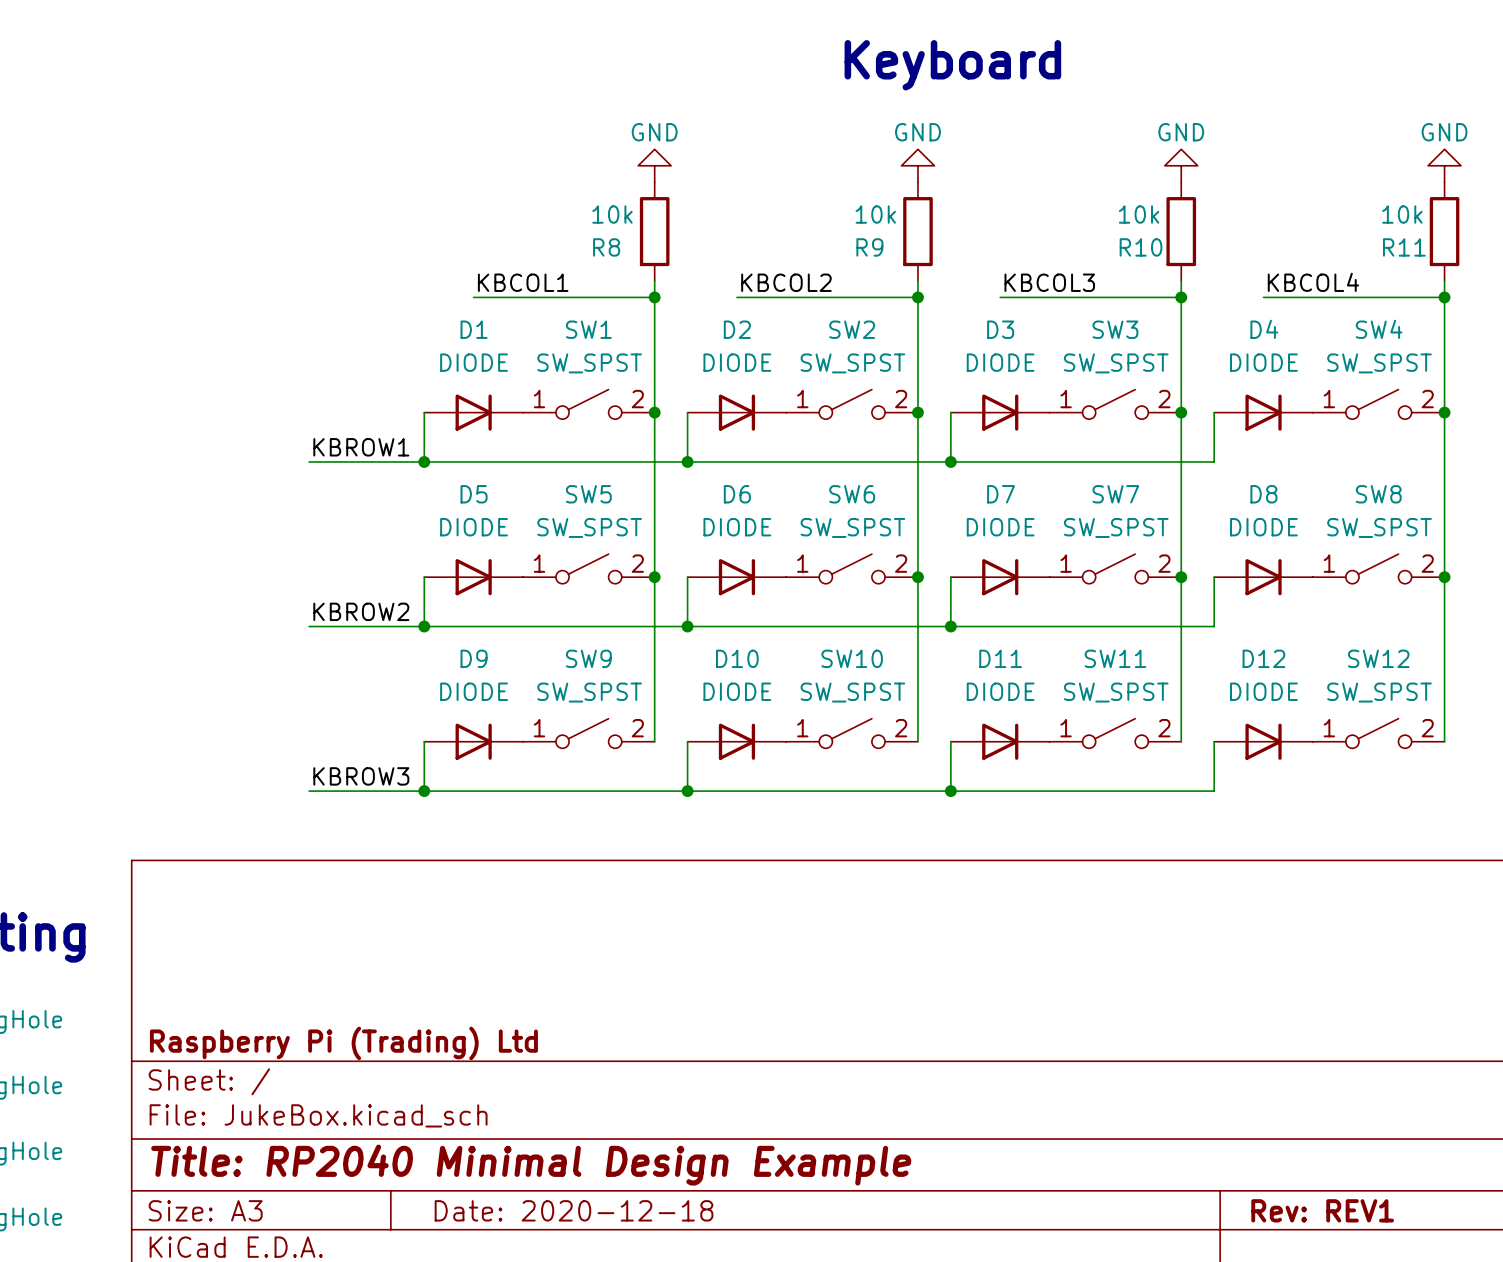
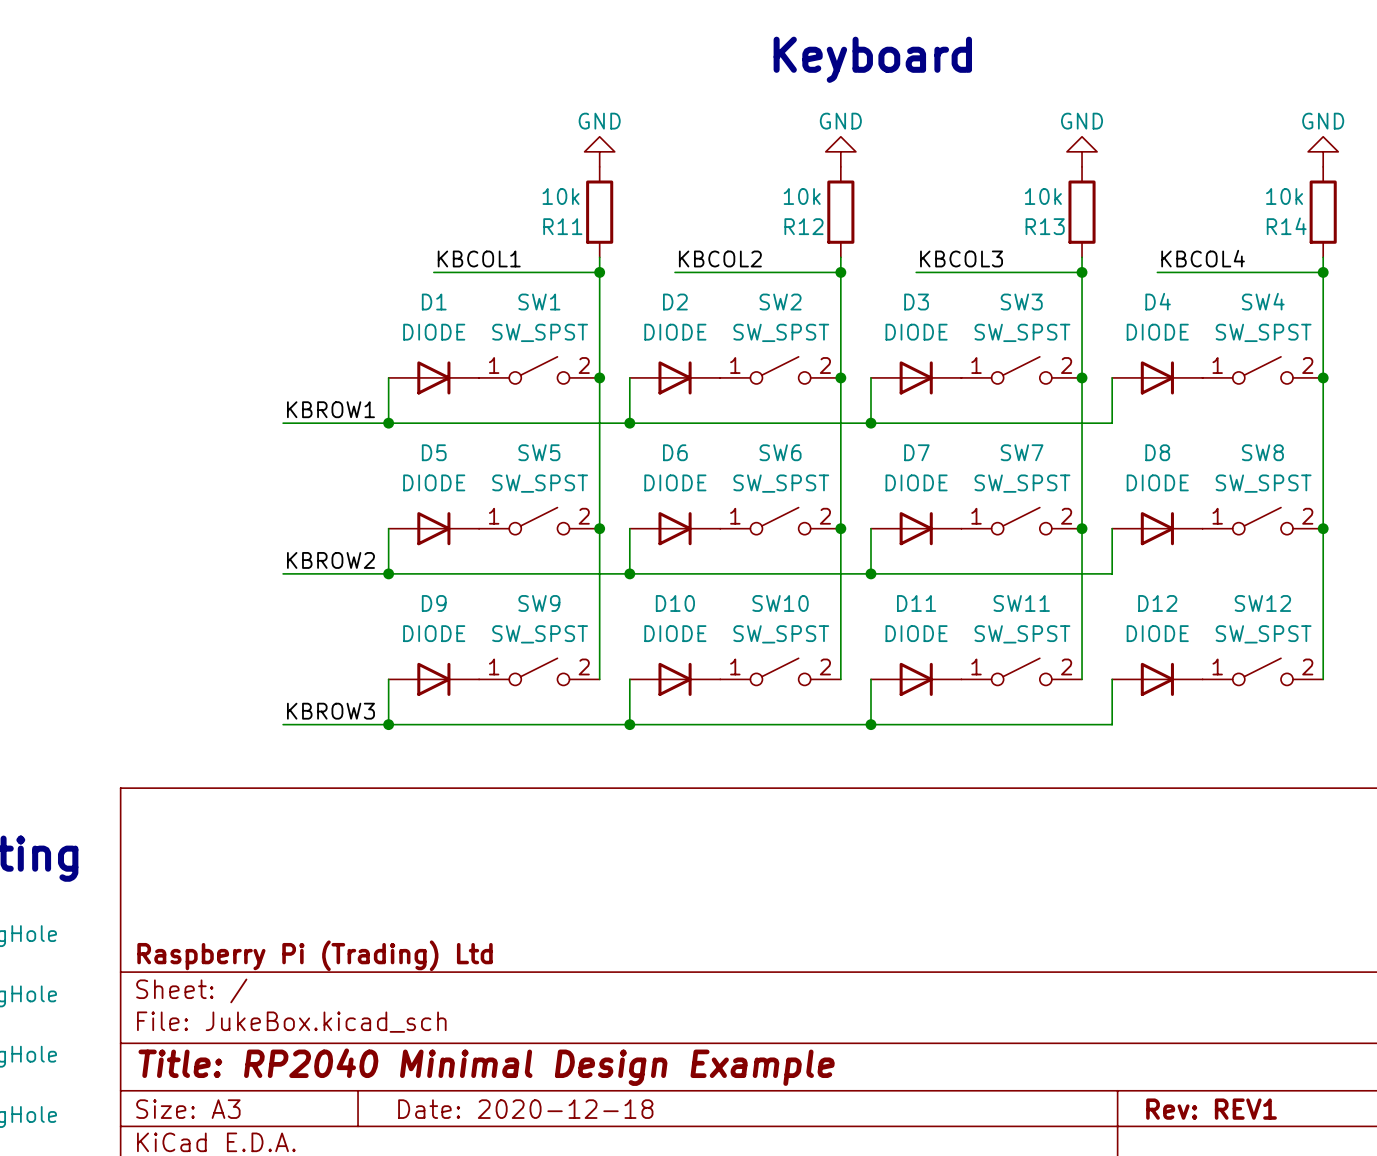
R8 name: R8 (606, 247) -> R11 (562, 226)
R9 name: R9 (869, 247) -> R12 (803, 226)
R10 name: R10 (1141, 247) -> R13 (1045, 226)
R11 name: R11 (1404, 247) -> R14 (1286, 226)

